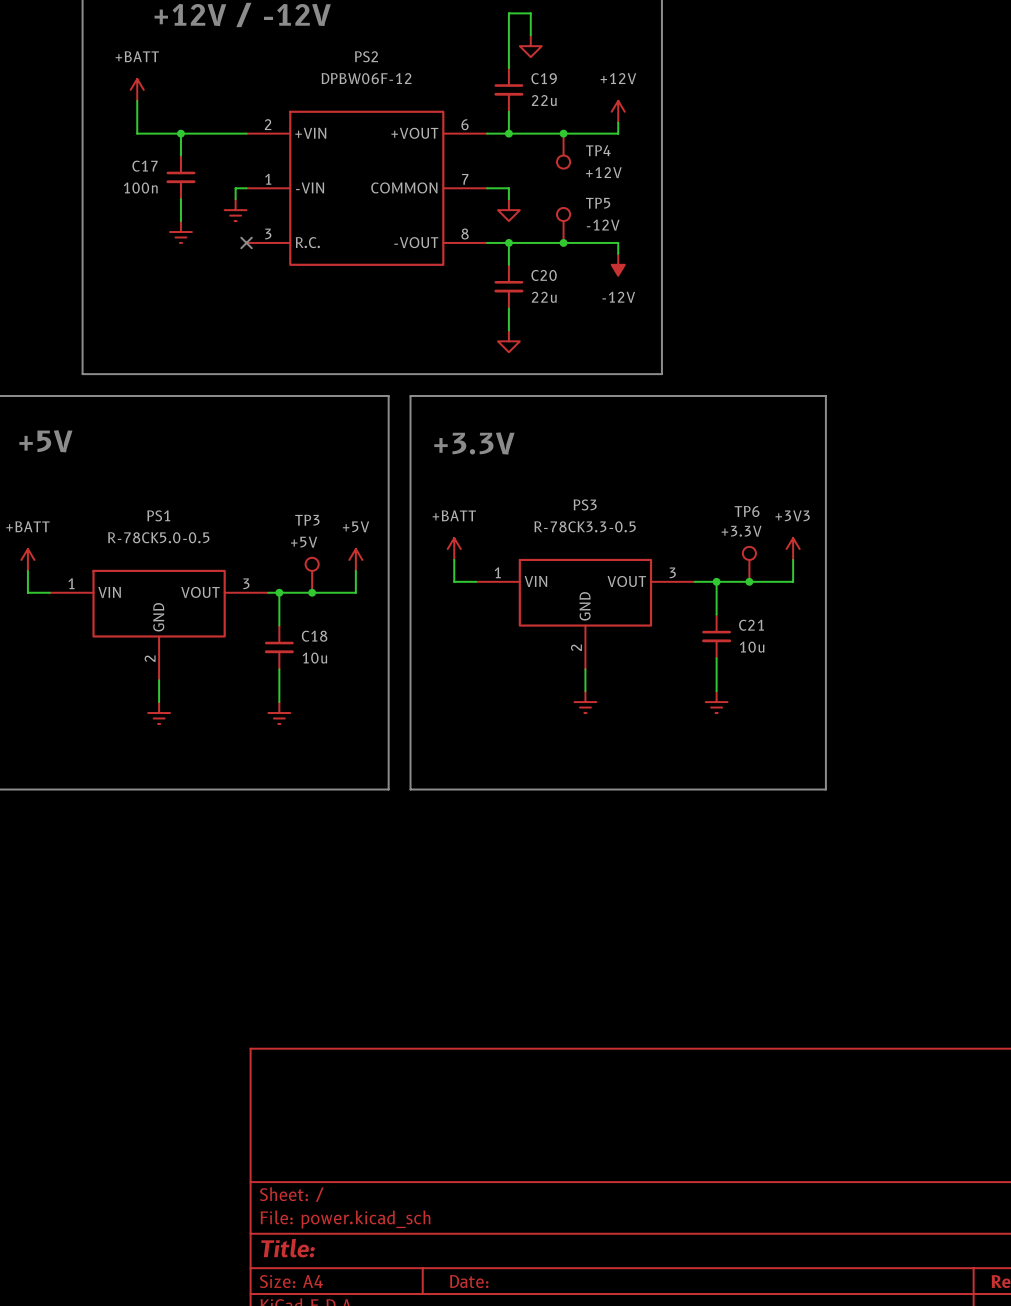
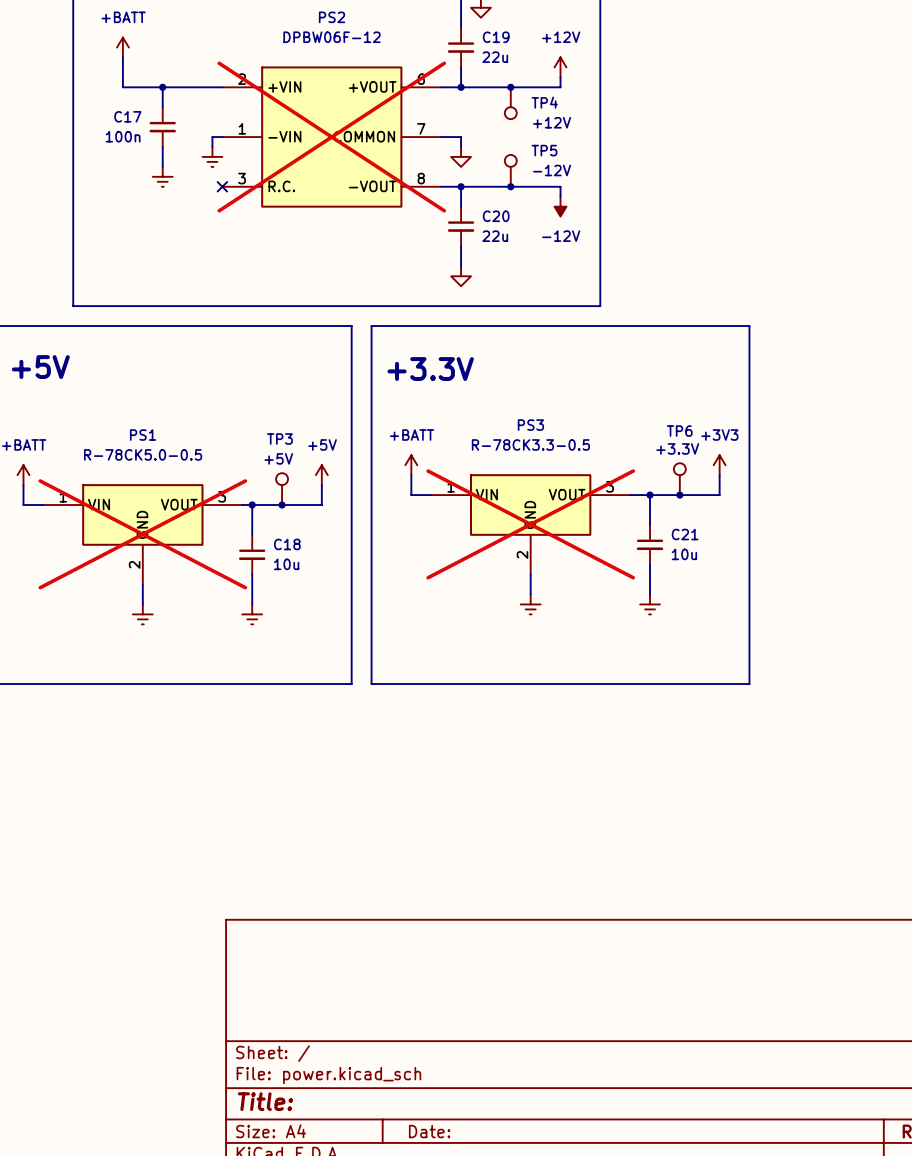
PS2 do-not-place cross: none -> (331, 137)
PS3 do-not-place cross: none -> (530, 524)
PS1 do-not-place cross: none -> (142, 534)

